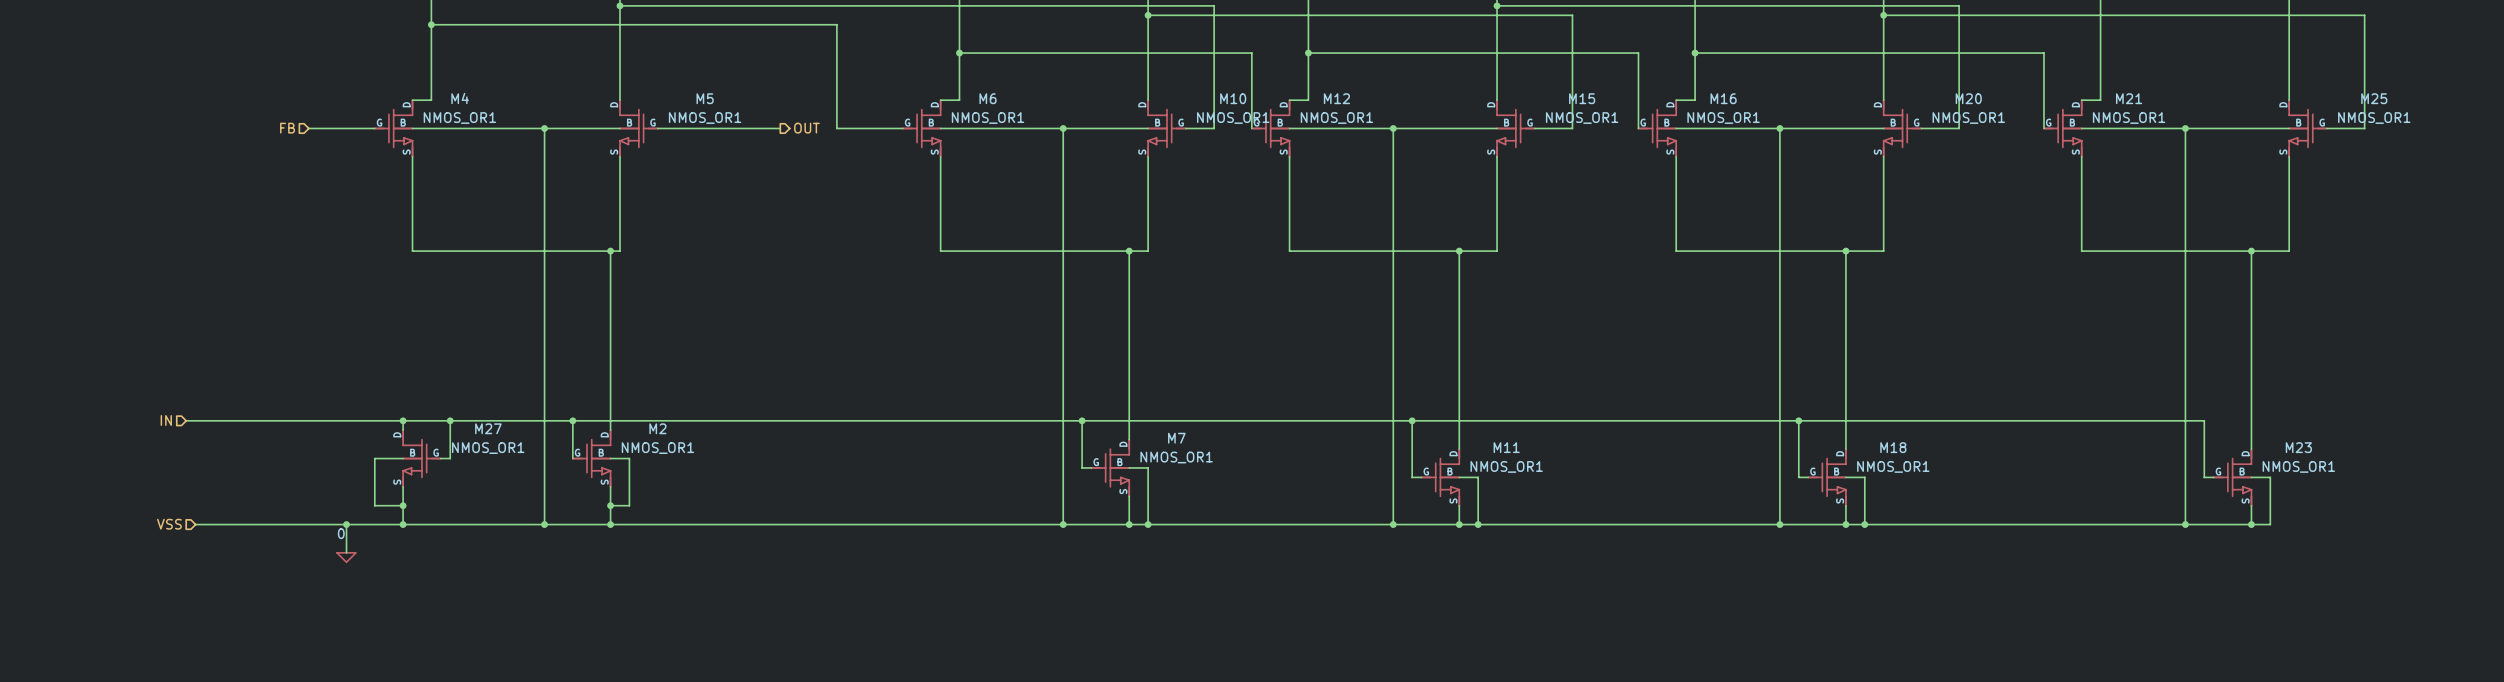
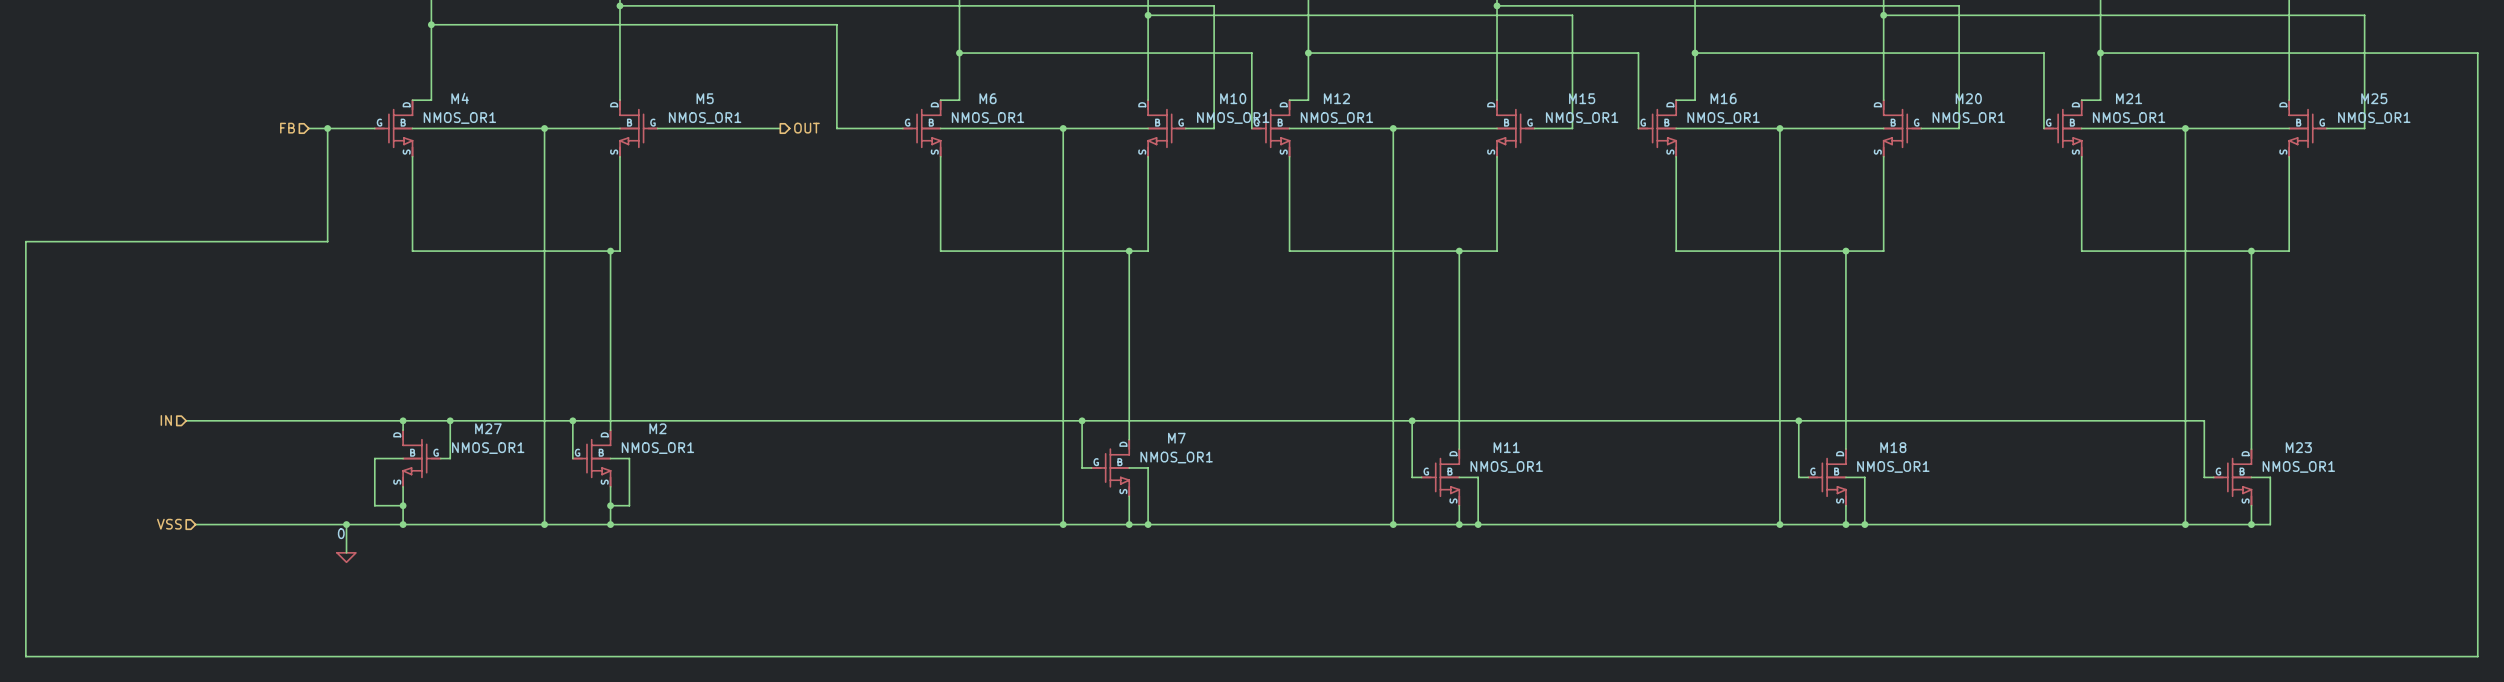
wire: none -> (2100, 53) (2477, 53) (2477, 656) (25, 656) (25, 241) (327, 241) (327, 128)
junction: none -> (2100, 53)
junction: none -> (327, 128)

